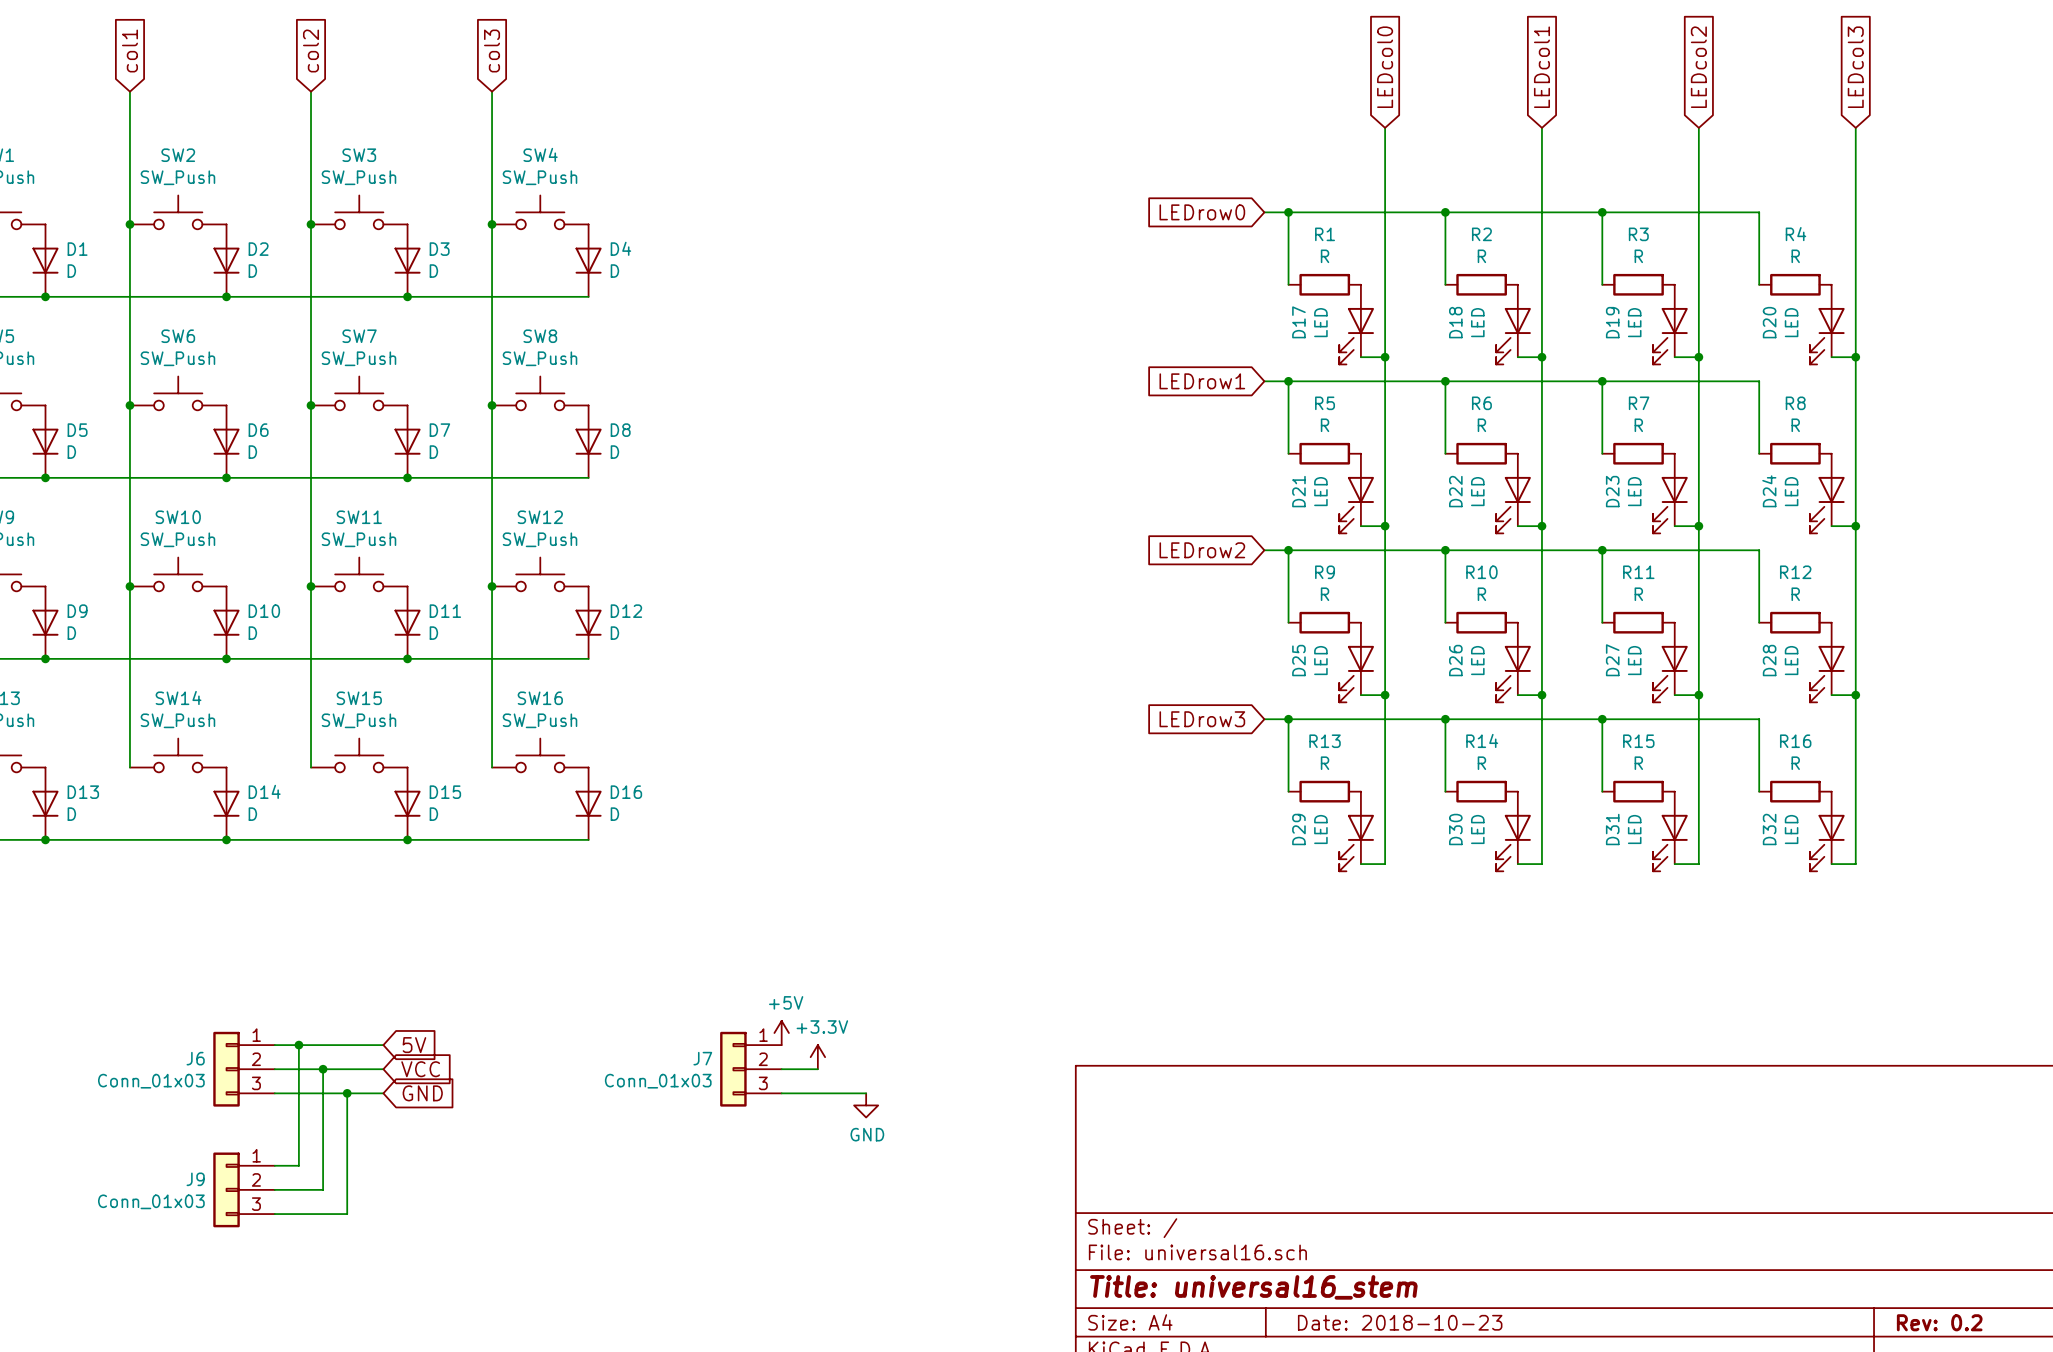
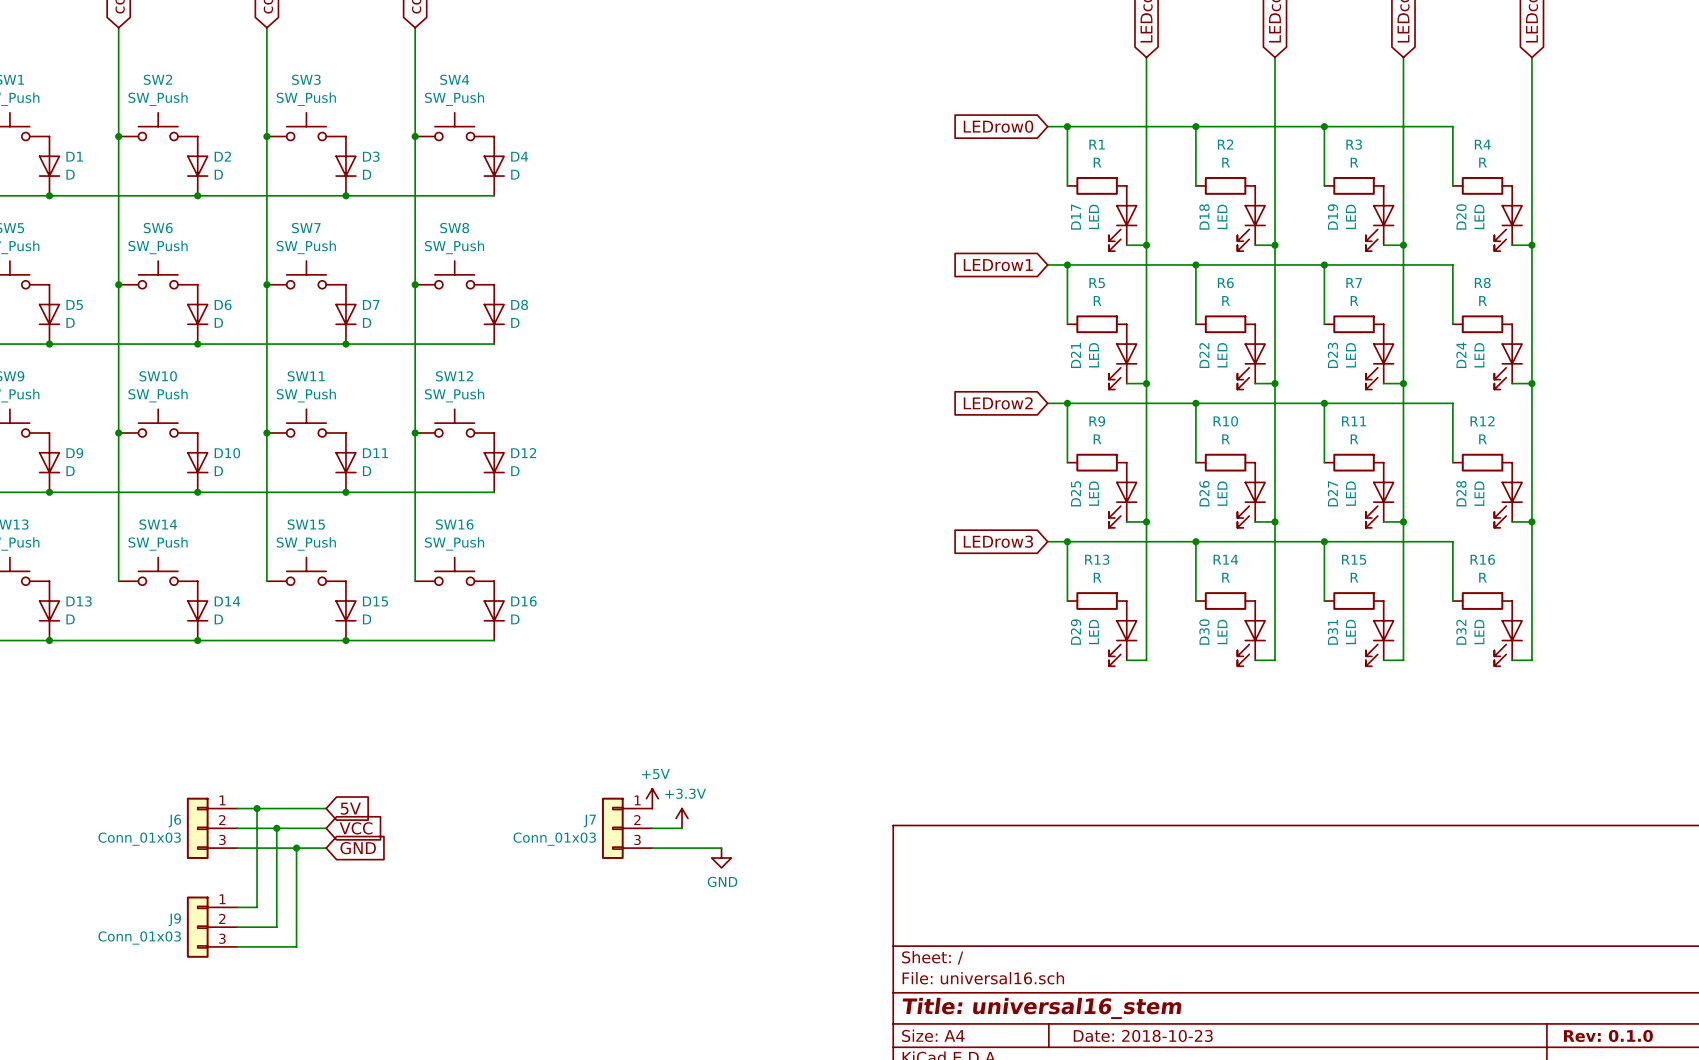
title block: Rev: 0.2 (1939, 1322) -> Rev: 0.1.0 (1608, 1035)

